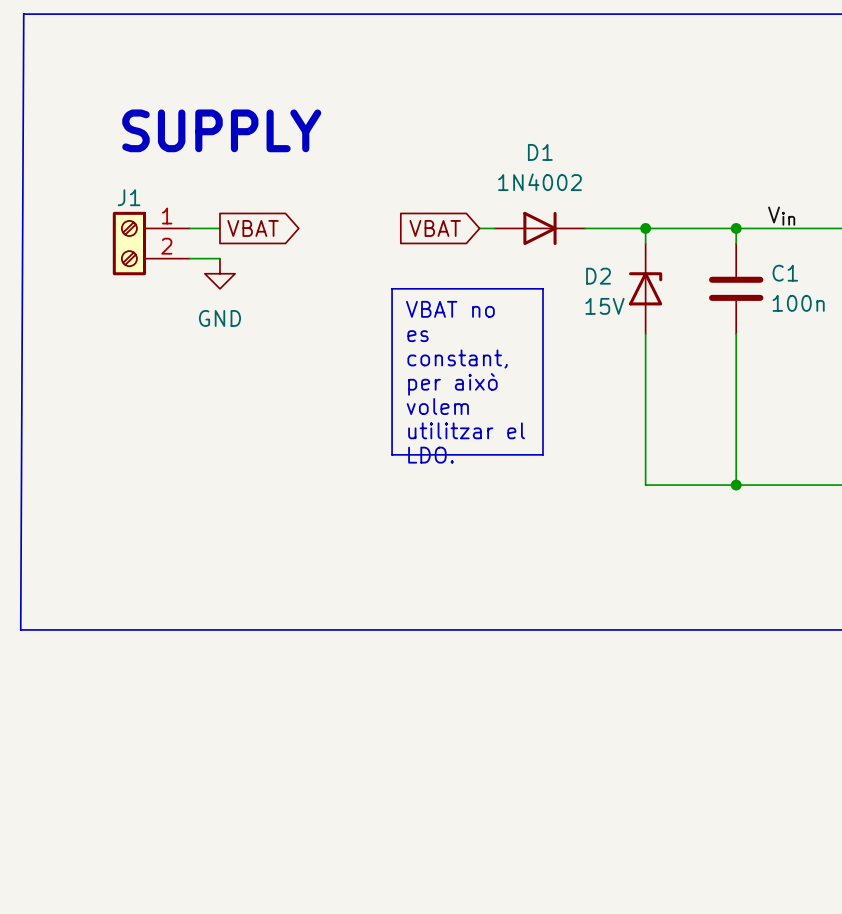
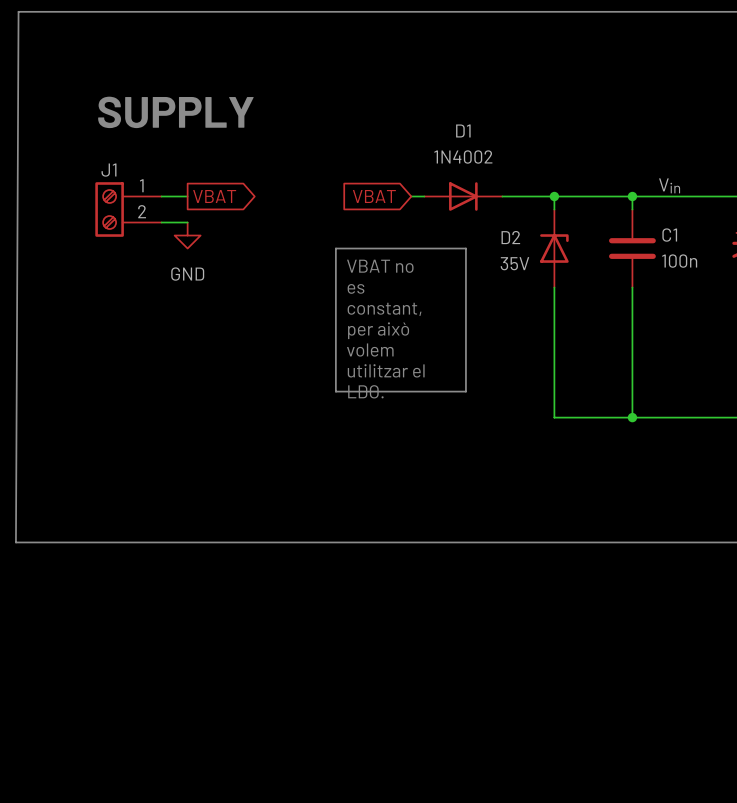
D2 value: 15V (604, 306) -> 35V (514, 263)

